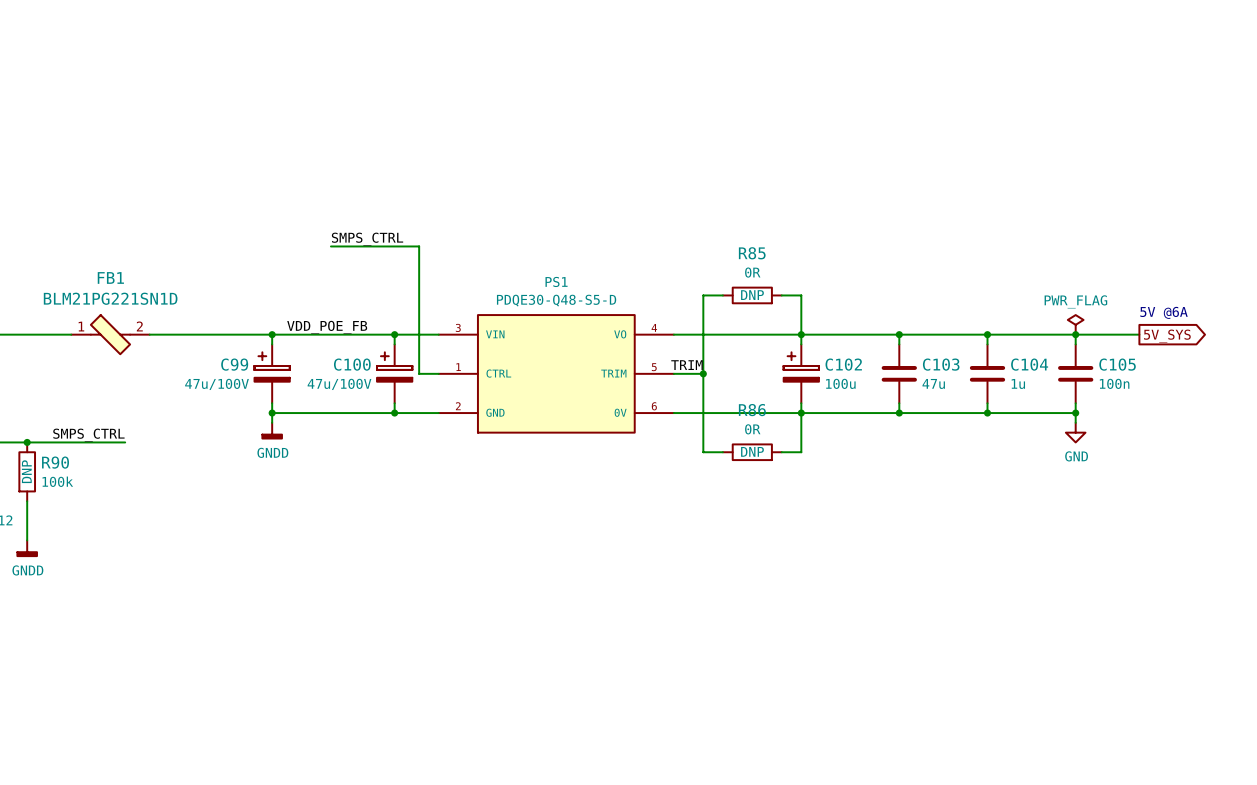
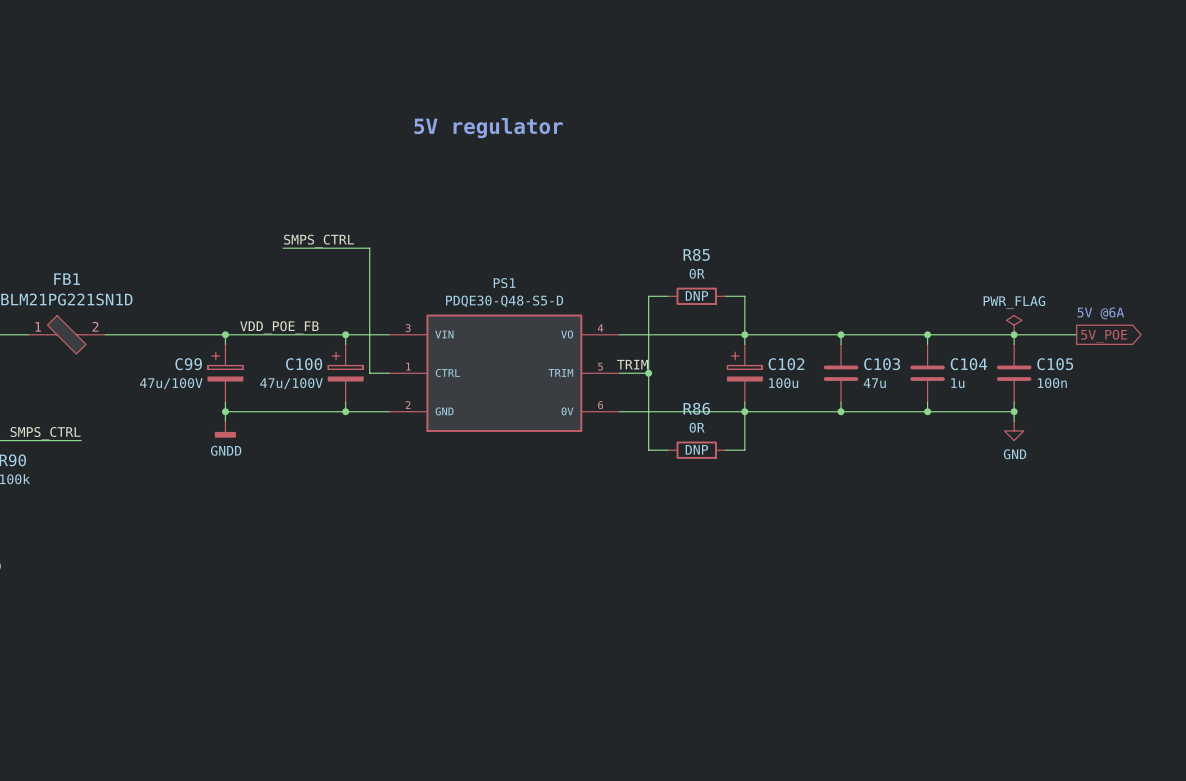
text: none -> 5V regulator (488, 128)
global label: 5V_SYS (1167, 336) -> 5V_POE (1104, 336)

